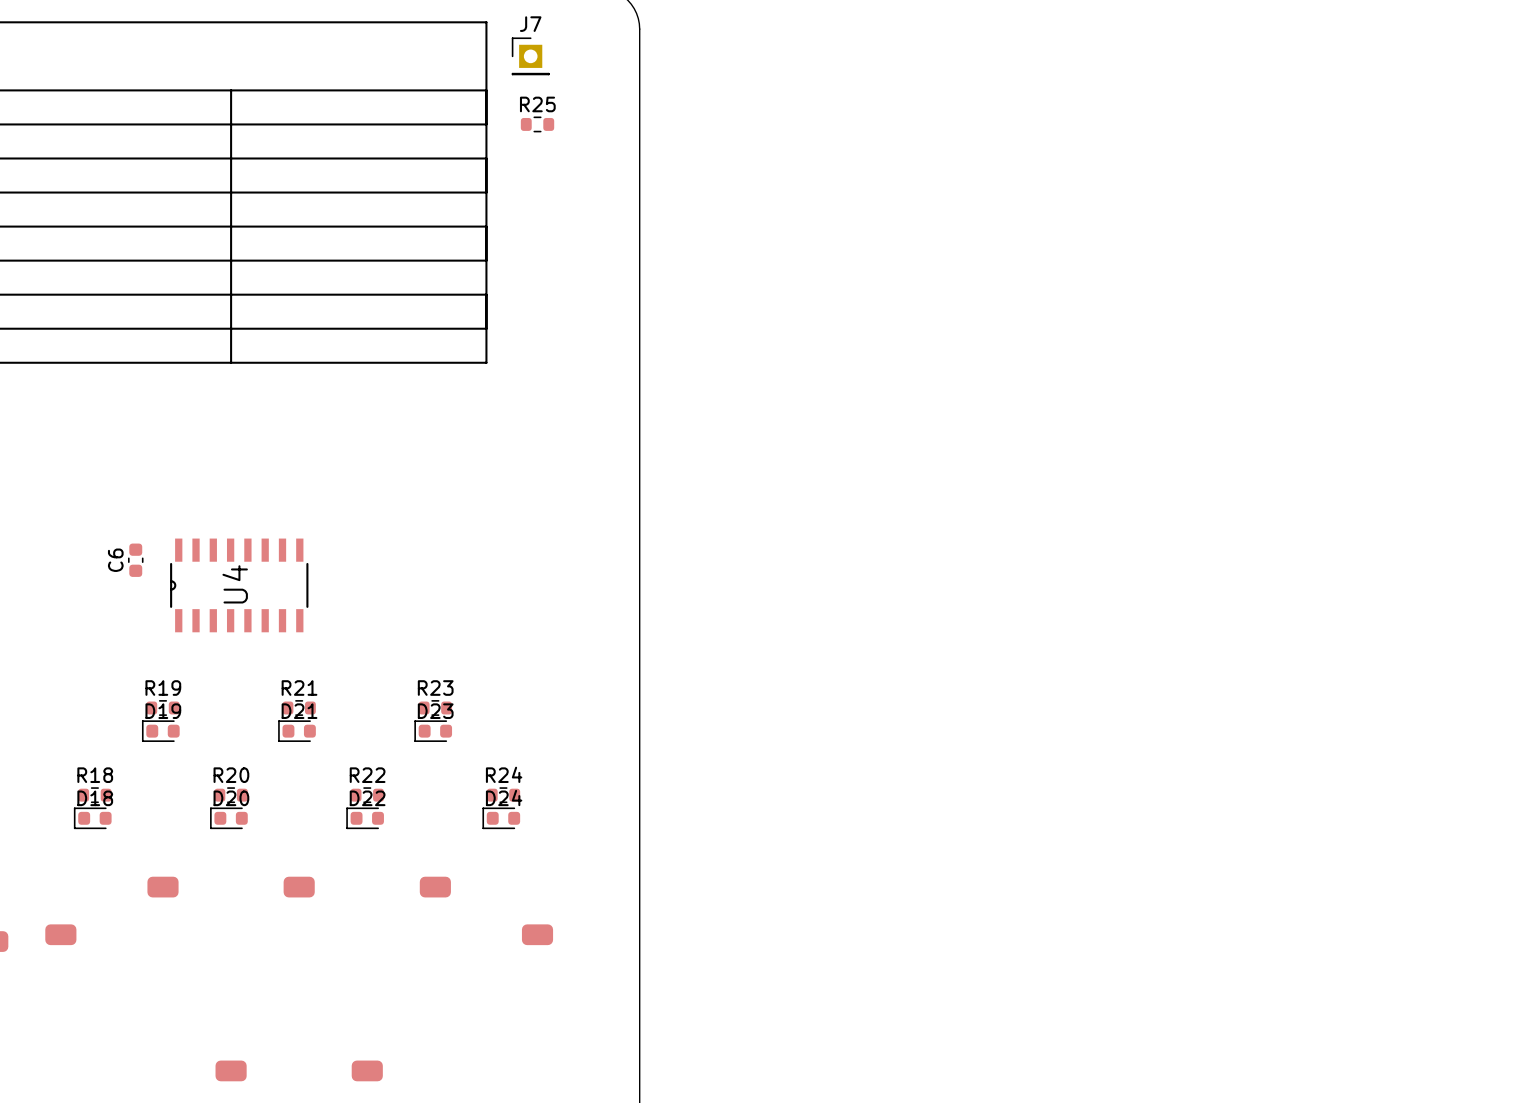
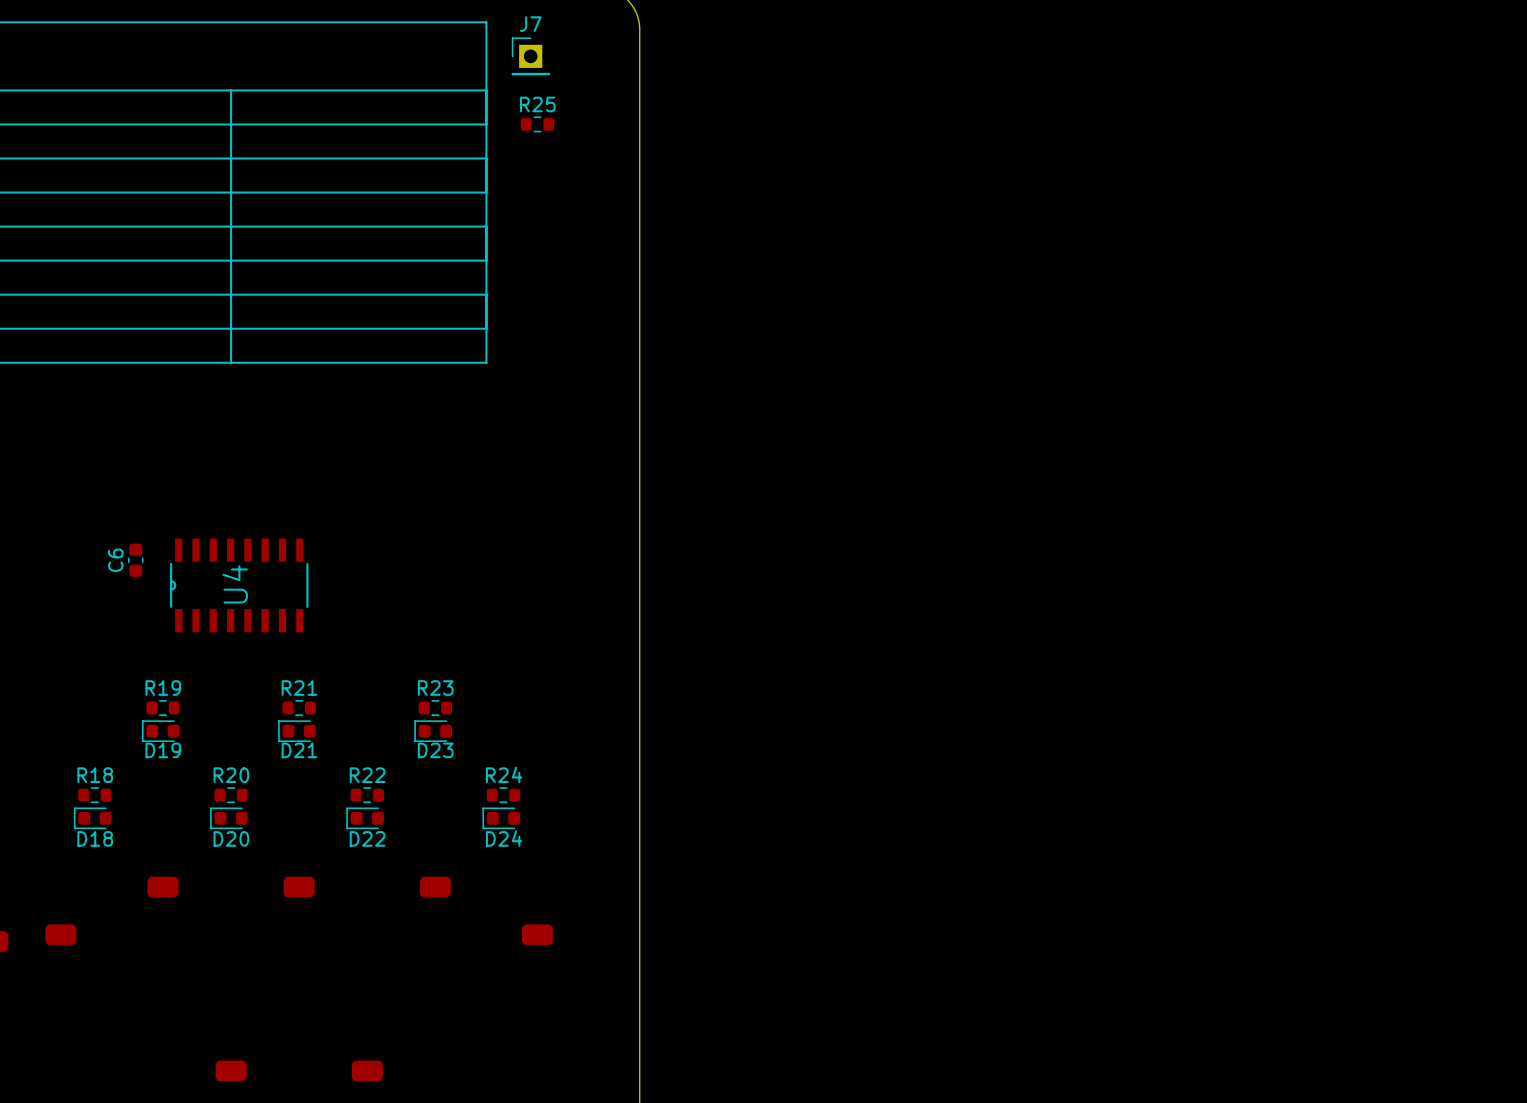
D19 name position: D19 (163, 711) -> D19 (163, 750)
D21 name position: D21 (299, 711) -> D21 (299, 750)
D23 name position: D23 (435, 711) -> D23 (435, 750)
D18 name position: D18 (95, 798) -> D18 (95, 838)
D20 name position: D20 (231, 798) -> D20 (231, 838)
D22 name position: D22 (367, 798) -> D22 (367, 838)
D24 name position: D24 (504, 798) -> D24 (504, 838)

